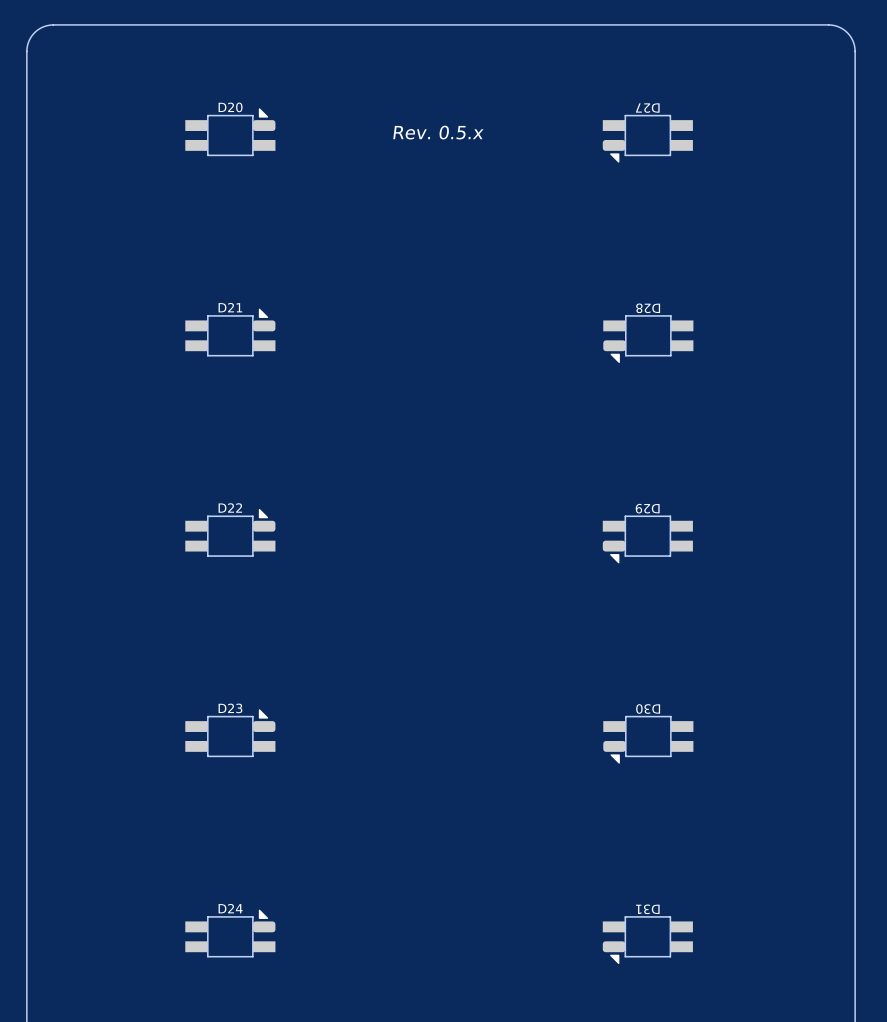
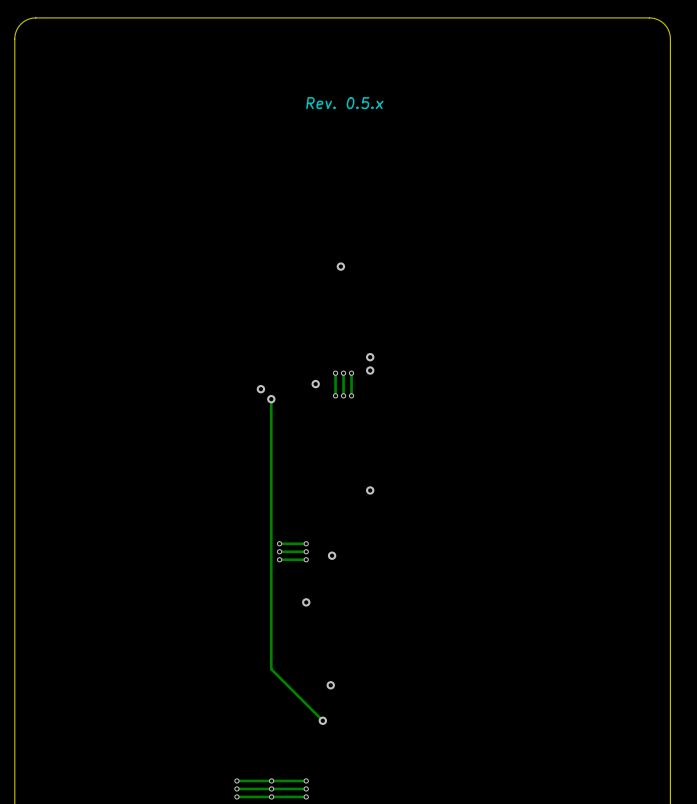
D20: (230, 132) -> none
D27: (647, 138) -> none
D21: (230, 332) -> none
via: none -> (340, 266)
D28: (648, 339) -> none
via: none -> (370, 357)
via: none -> (370, 370)
track: none -> (335, 373) (335, 395)
via: none -> (335, 373)
track: none -> (343, 373) (343, 395)
via: none -> (343, 373)
track: none -> (351, 373) (351, 395)
via: none -> (351, 373)
via: none -> (315, 384)
via: none -> (260, 389)
via: none -> (335, 395)
via: none -> (343, 395)
via: none -> (351, 395)
track: none -> (271, 399) (271, 669) (322, 720)
via: none -> (271, 399)
D22: (230, 532) -> none
D29: (647, 539) -> none
via: none -> (370, 490)
via: none -> (279, 543)
track: none -> (306, 543) (279, 543)
via: none -> (306, 543)
via: none -> (279, 551)
track: none -> (306, 551) (279, 551)
via: none -> (306, 551)
via: none -> (332, 555)
via: none -> (279, 559)
track: none -> (306, 559) (279, 559)
via: none -> (306, 559)
D23: (230, 733) -> none
D30: (648, 739) -> none
via: none -> (306, 602)
via: none -> (330, 685)
via: none -> (322, 720)
D24: (230, 933) -> none
D31: (647, 940) -> none
via: none -> (236, 780)
via: none -> (271, 780)
track: none -> (306, 780) (236, 780)
via: none -> (306, 780)
via: none -> (236, 788)
via: none -> (271, 788)
track: none -> (306, 788) (236, 788)
via: none -> (306, 788)
via: none -> (236, 796)
via: none -> (271, 796)
track: none -> (306, 796) (236, 796)
via: none -> (306, 796)

